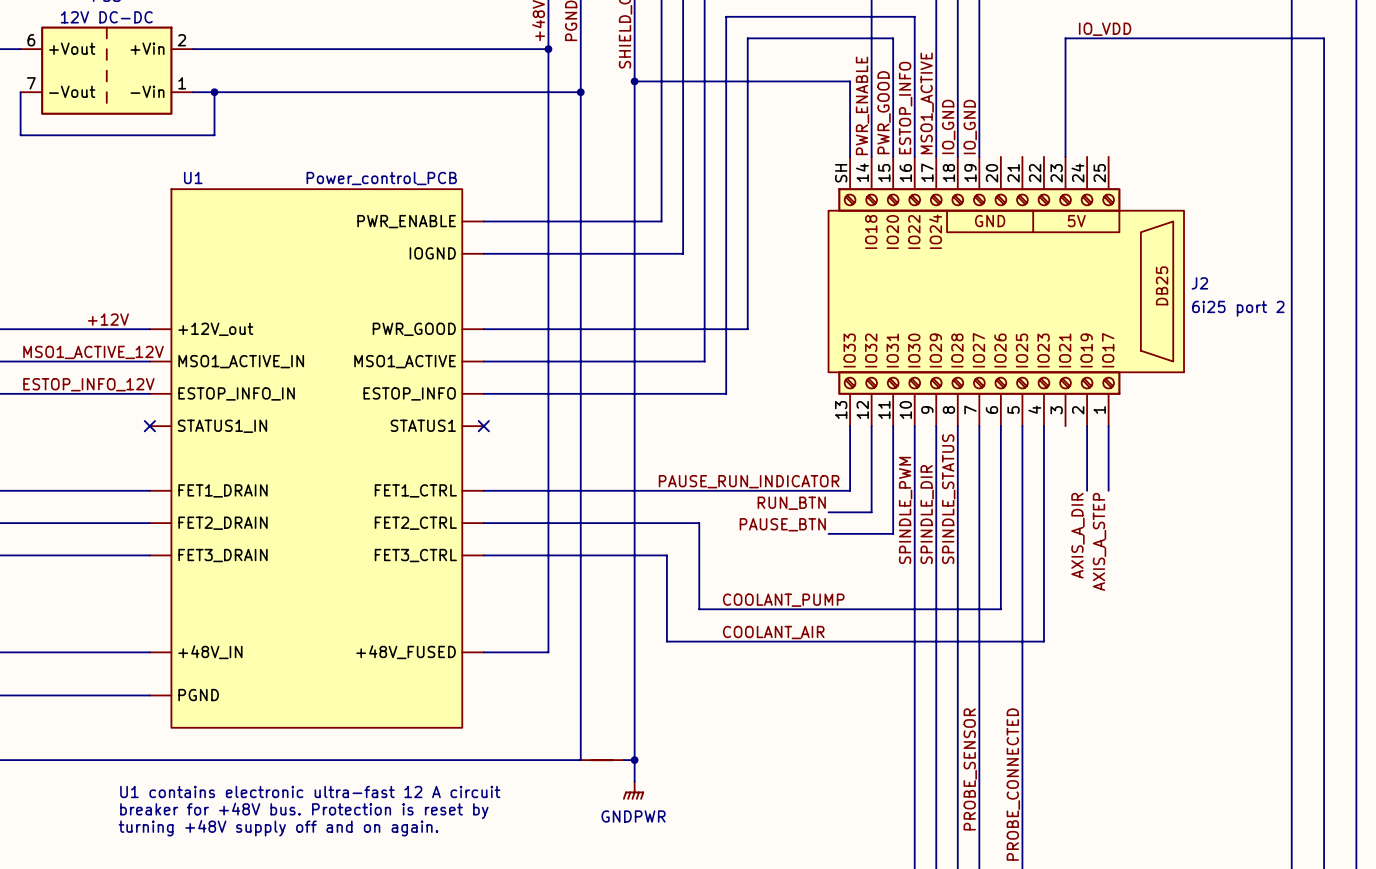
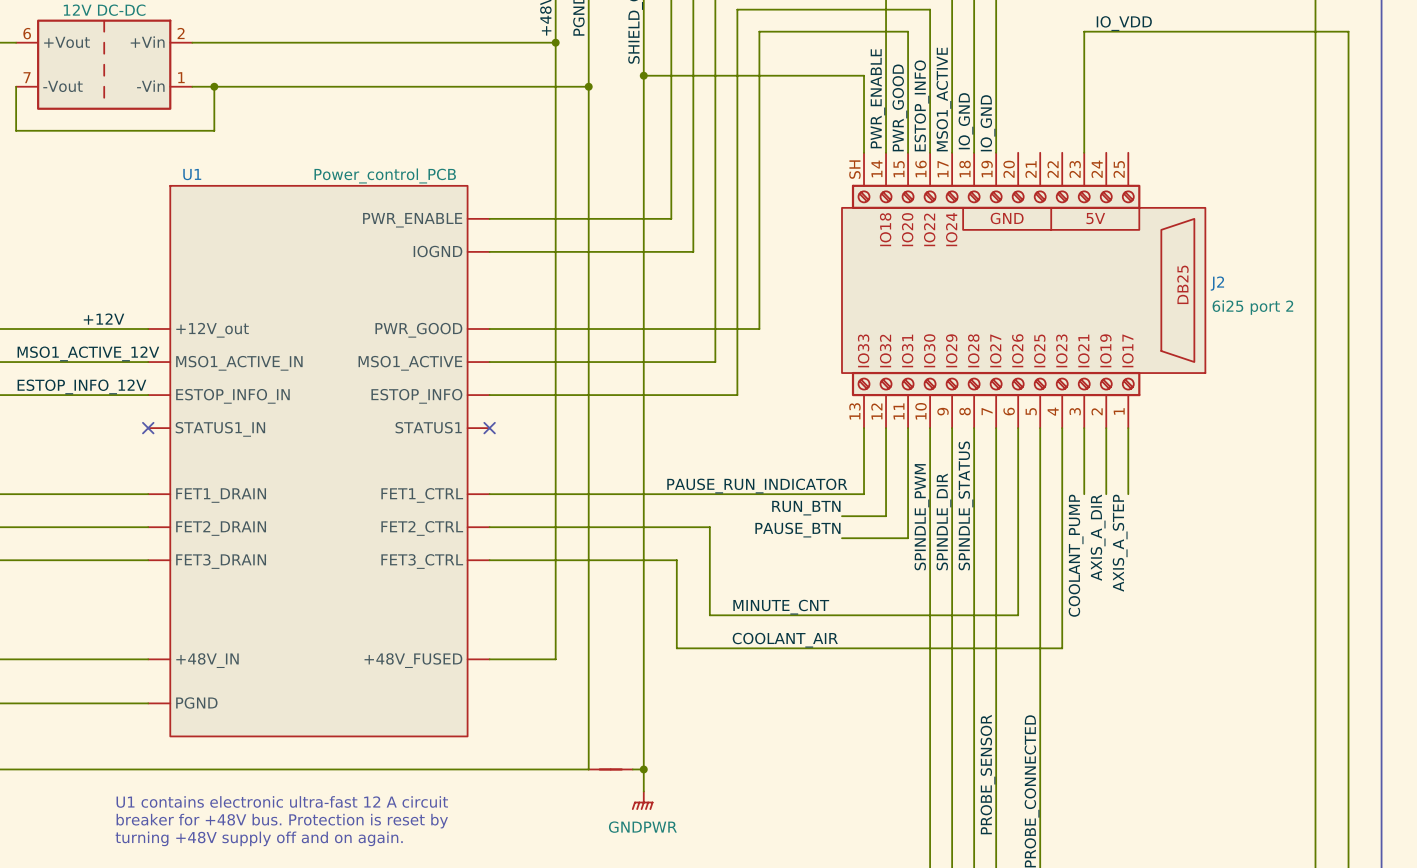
wire: none -> (1084, 428) (1084, 494)
label: none -> COOLANT_PUMP (1076, 555)
label: COOLANT_PUMP (783, 600) -> MINUTE_CNT (781, 607)

